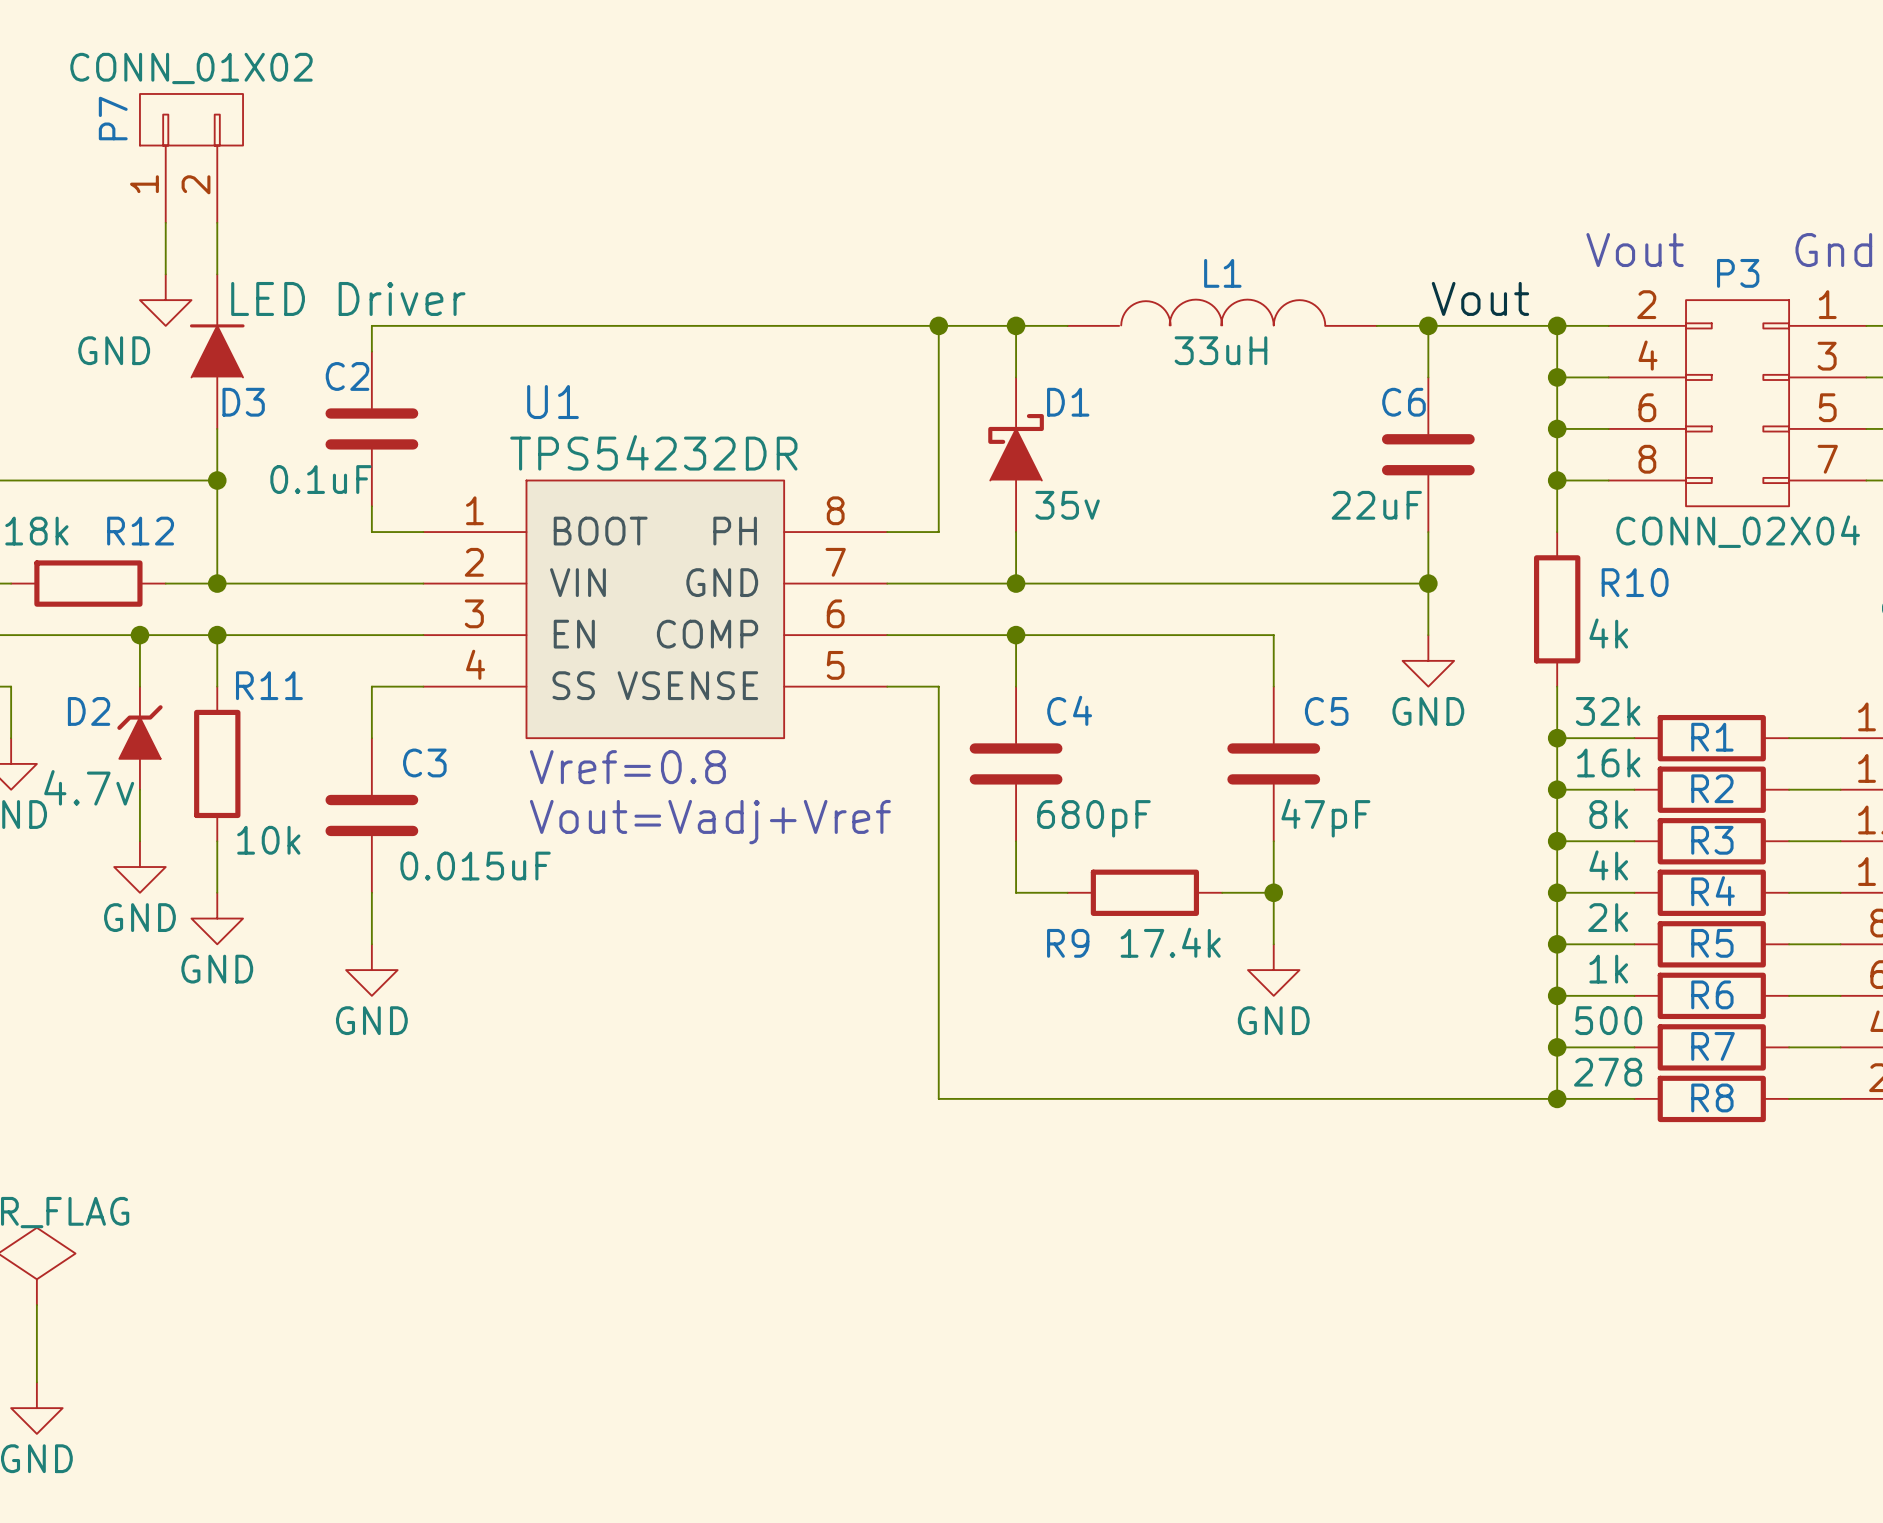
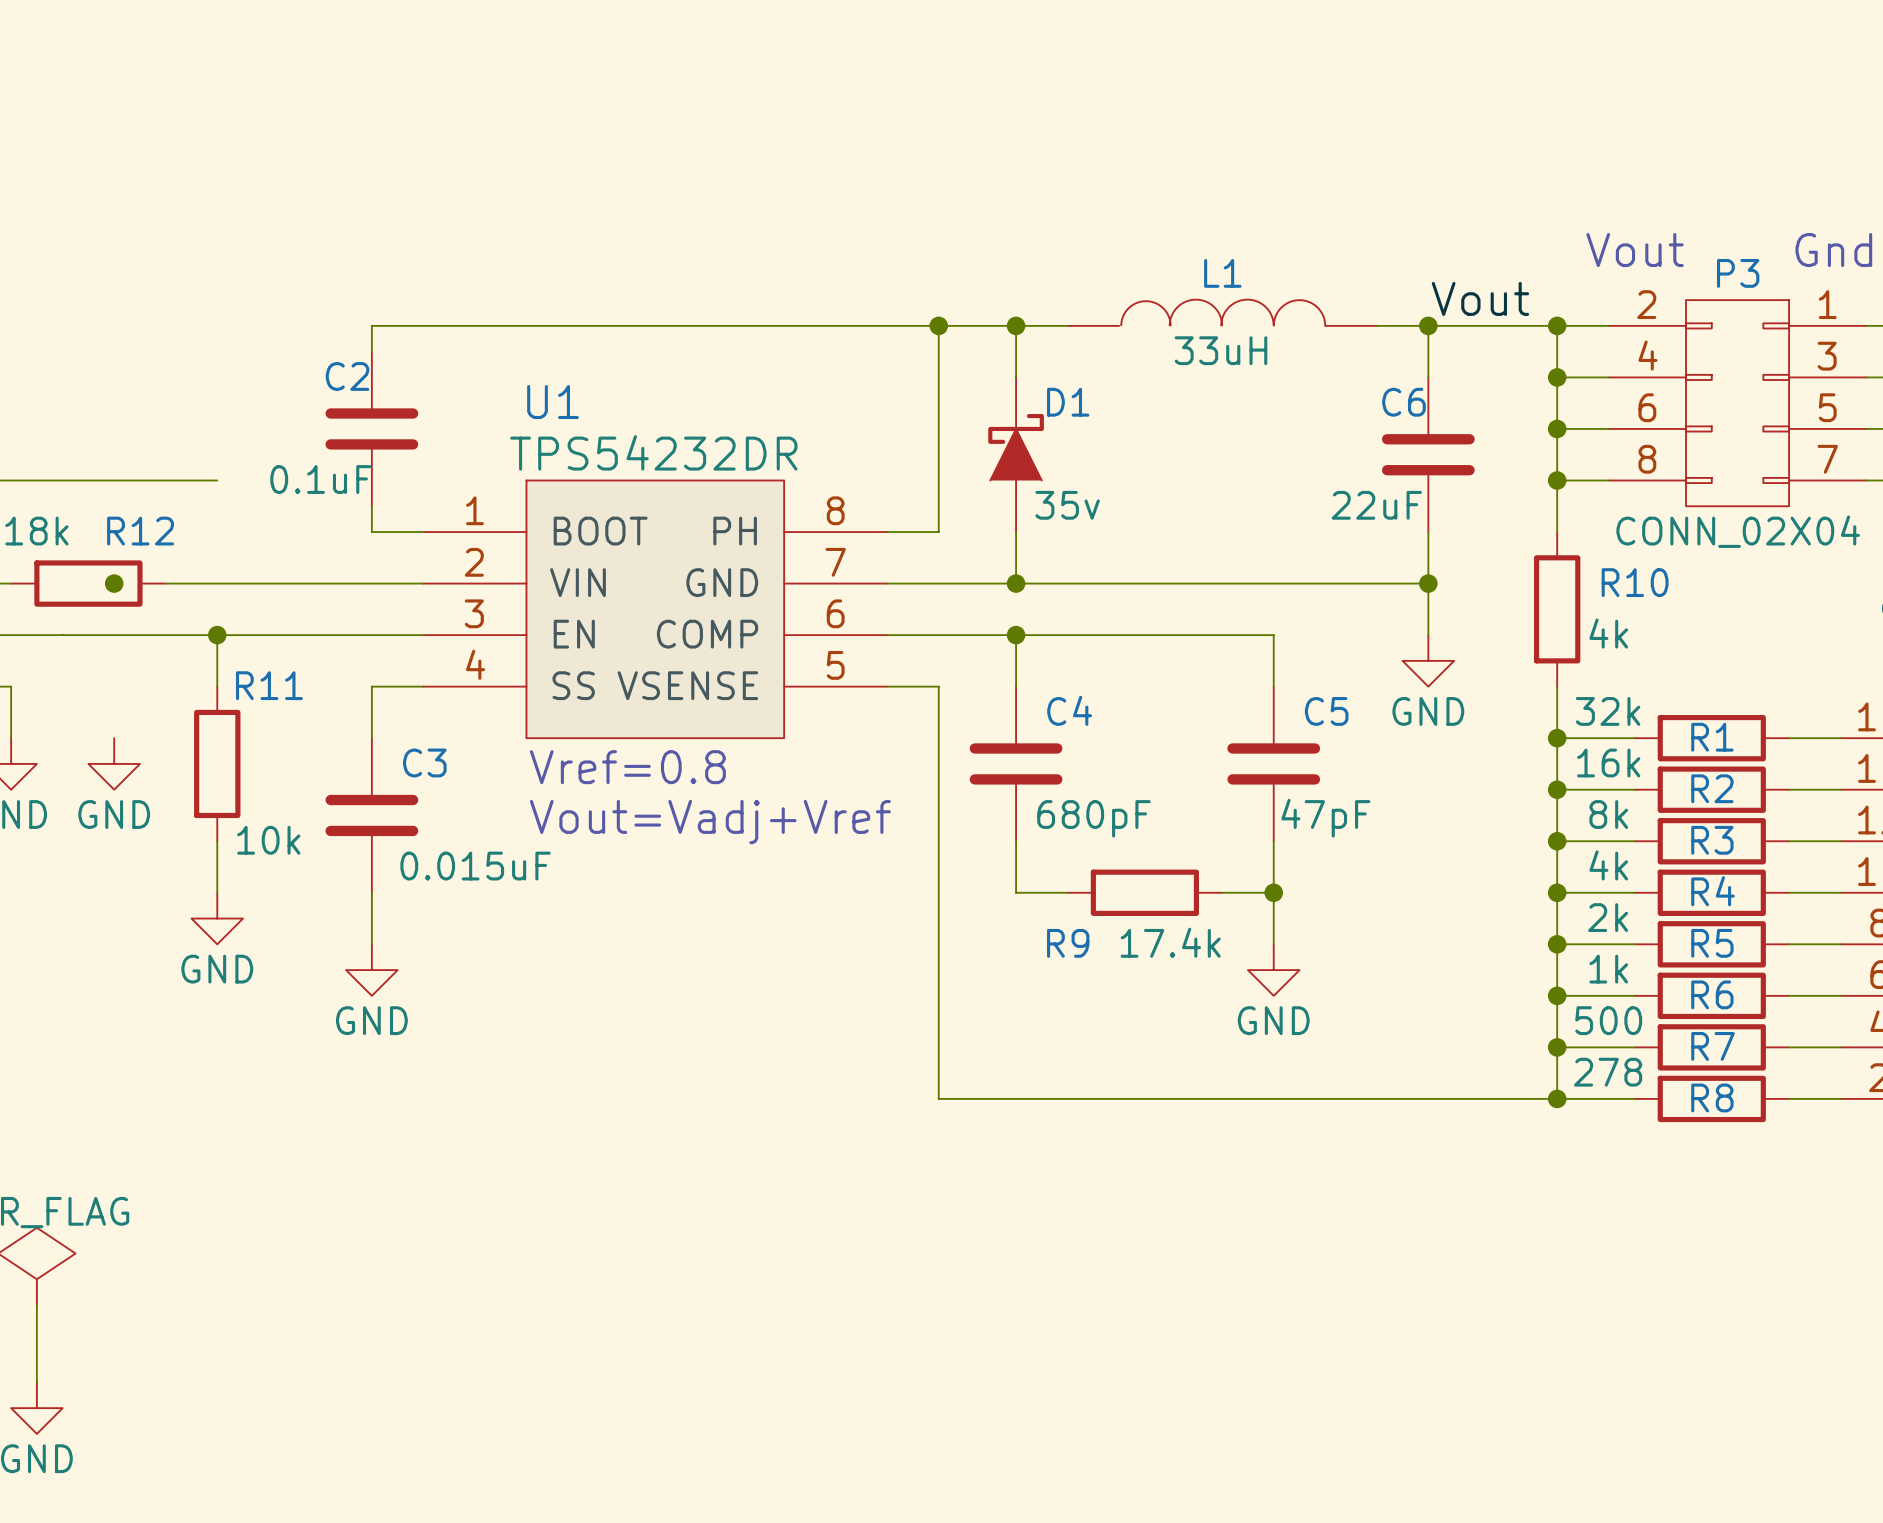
P7: CONN_01X02 (191, 158) -> none
wire: (165, 222) (165, 274) -> none
wire: (217, 222) (217, 274) -> none
power symbol: GND (165, 300) -> none
D3: (217, 351) -> none
wire: (217, 428) (217, 583) -> none
junction: (217, 480) -> none
junction: none -> (114, 583)
junction: (217, 583) -> none
wire: (139, 635) (139, 686) -> none
junction: (139, 635) -> none
D2: (139, 738) -> none
wire: (139, 789) (139, 841) -> none
power symbol position: GND (139, 867) -> GND (114, 763)

